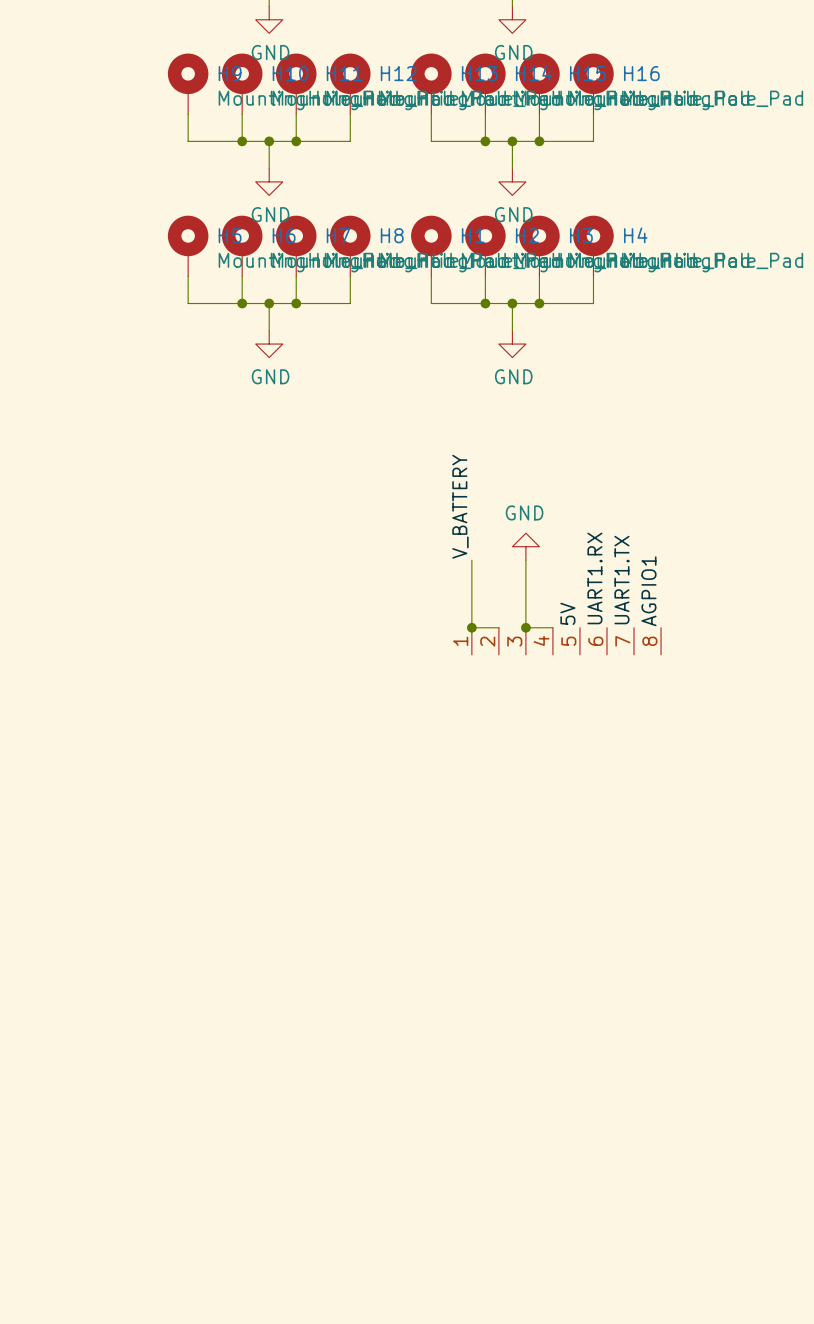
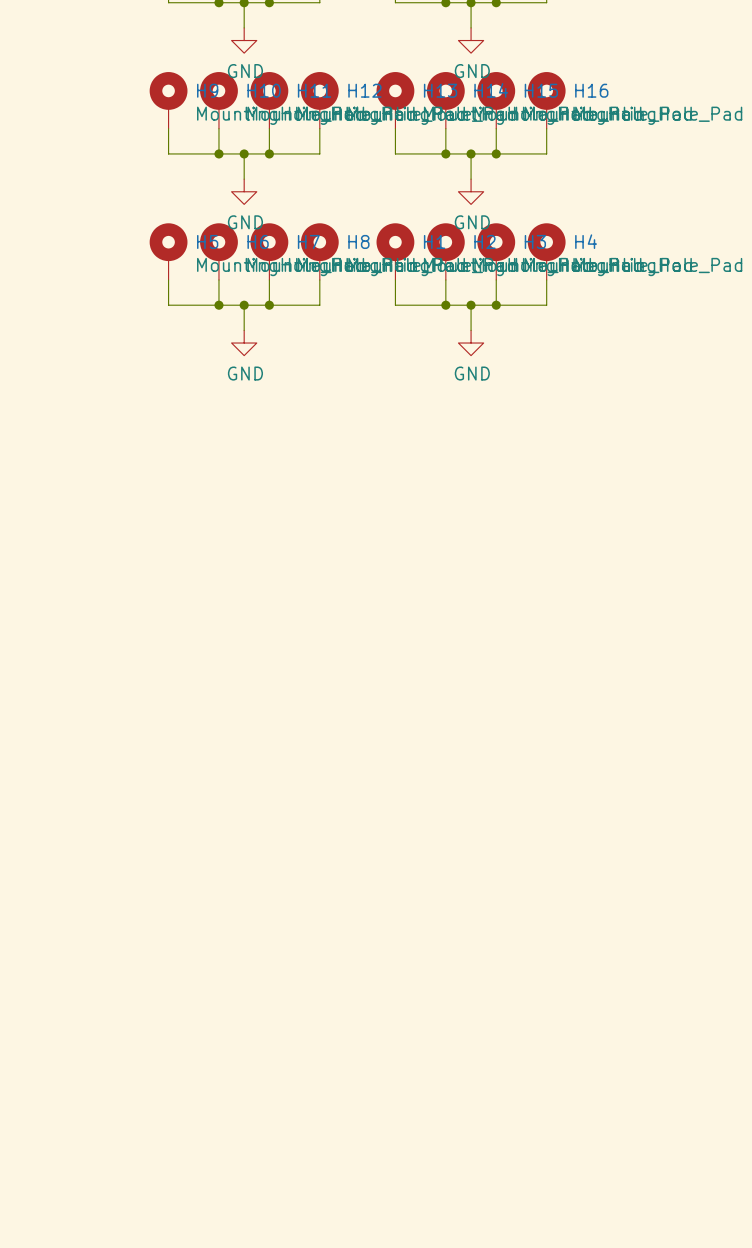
label: V_BATTERY (460, 506) -> none
power symbol: GND (525, 546) -> none
wire: (471, 560) (471, 627) (498, 627) -> none
wire: (525, 560) (525, 627) (552, 627) -> none
label: UART1.RX (594, 578) -> none
label: UART1.TX (621, 580) -> none
label: AGPIO1 (648, 591) -> none
label: 5V (567, 613) -> none
junction: (471, 627) -> none
junction: (525, 627) -> none
part: (566, 641) -> none

